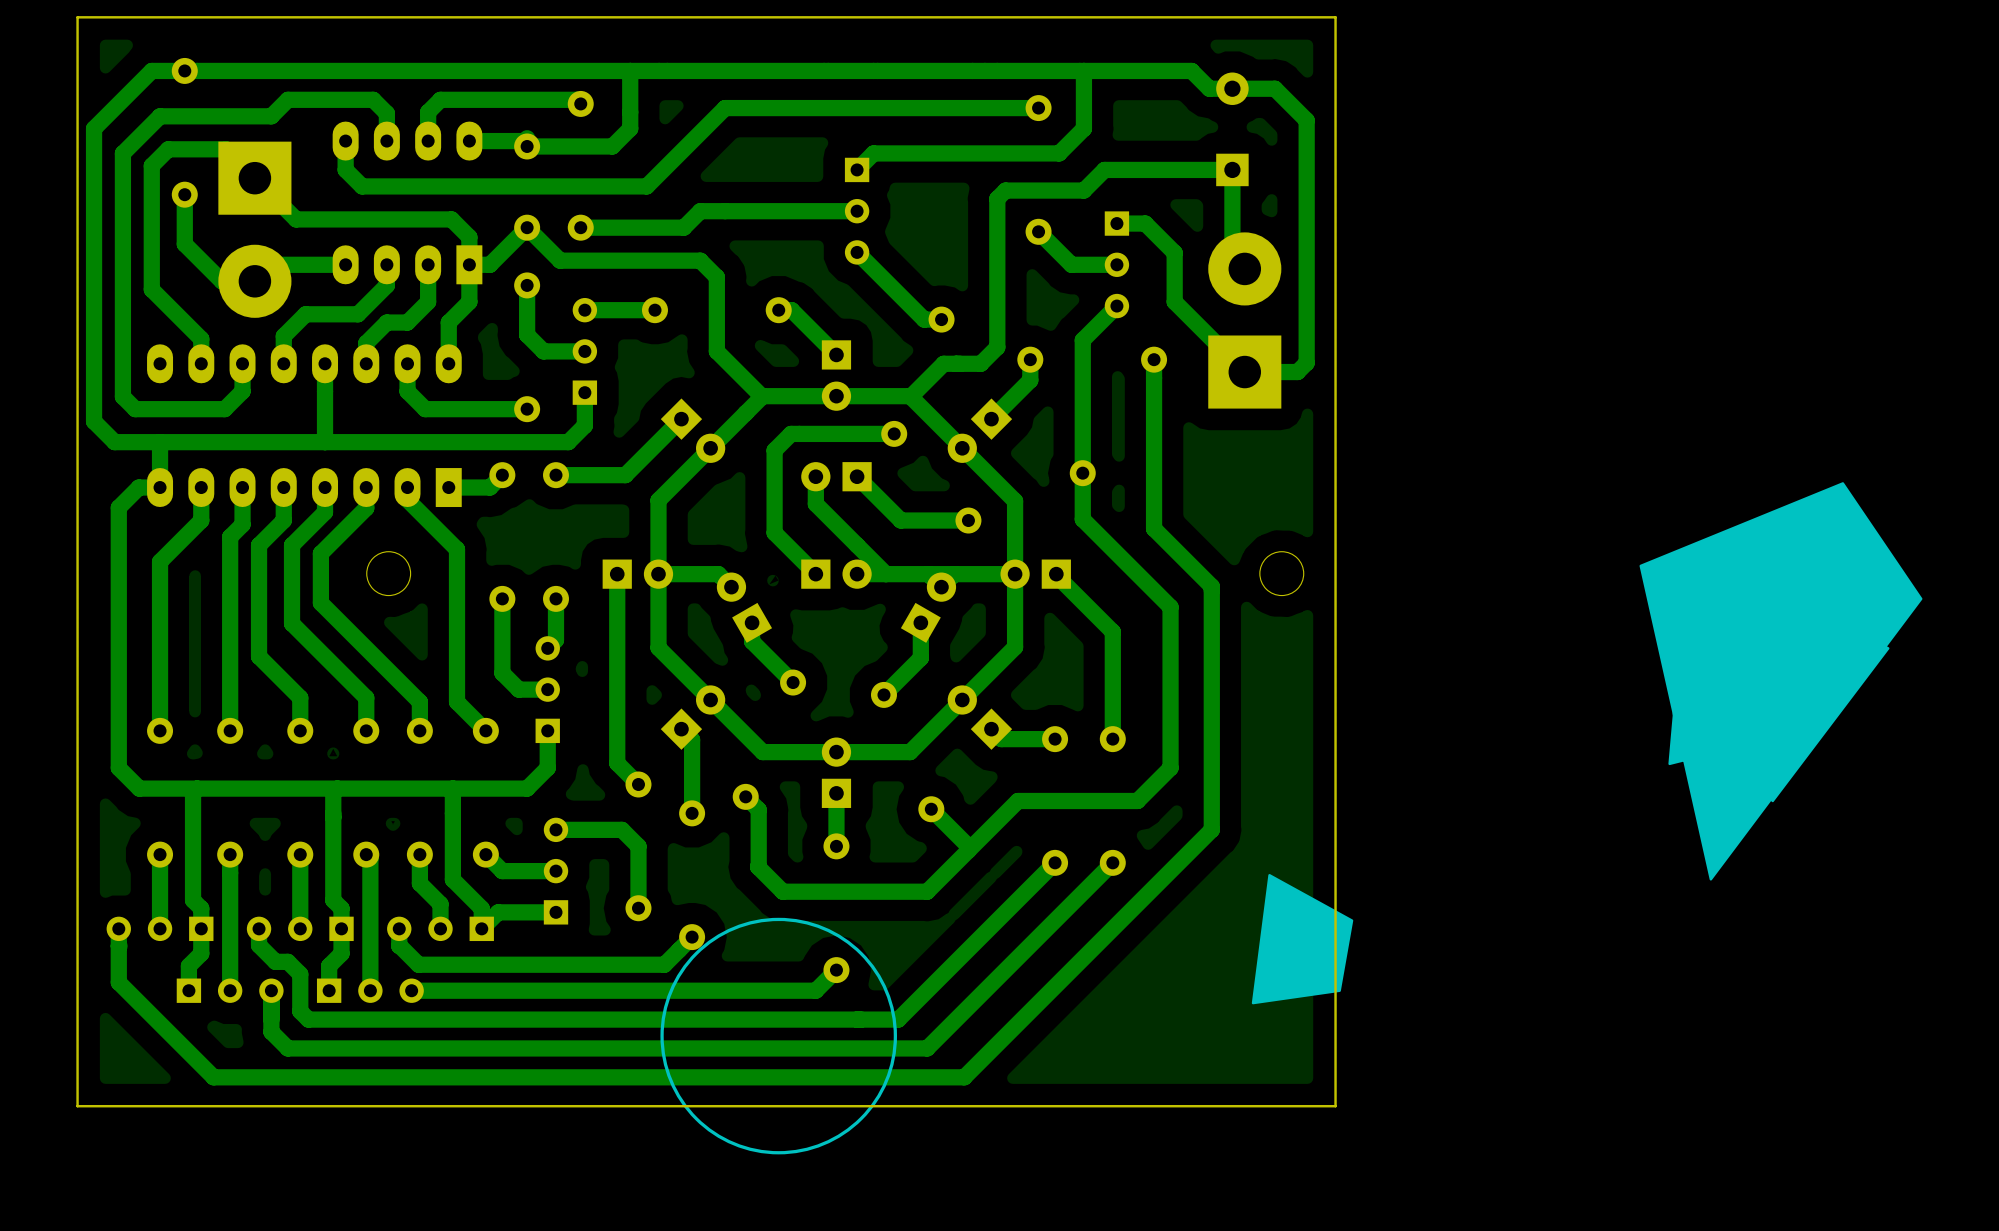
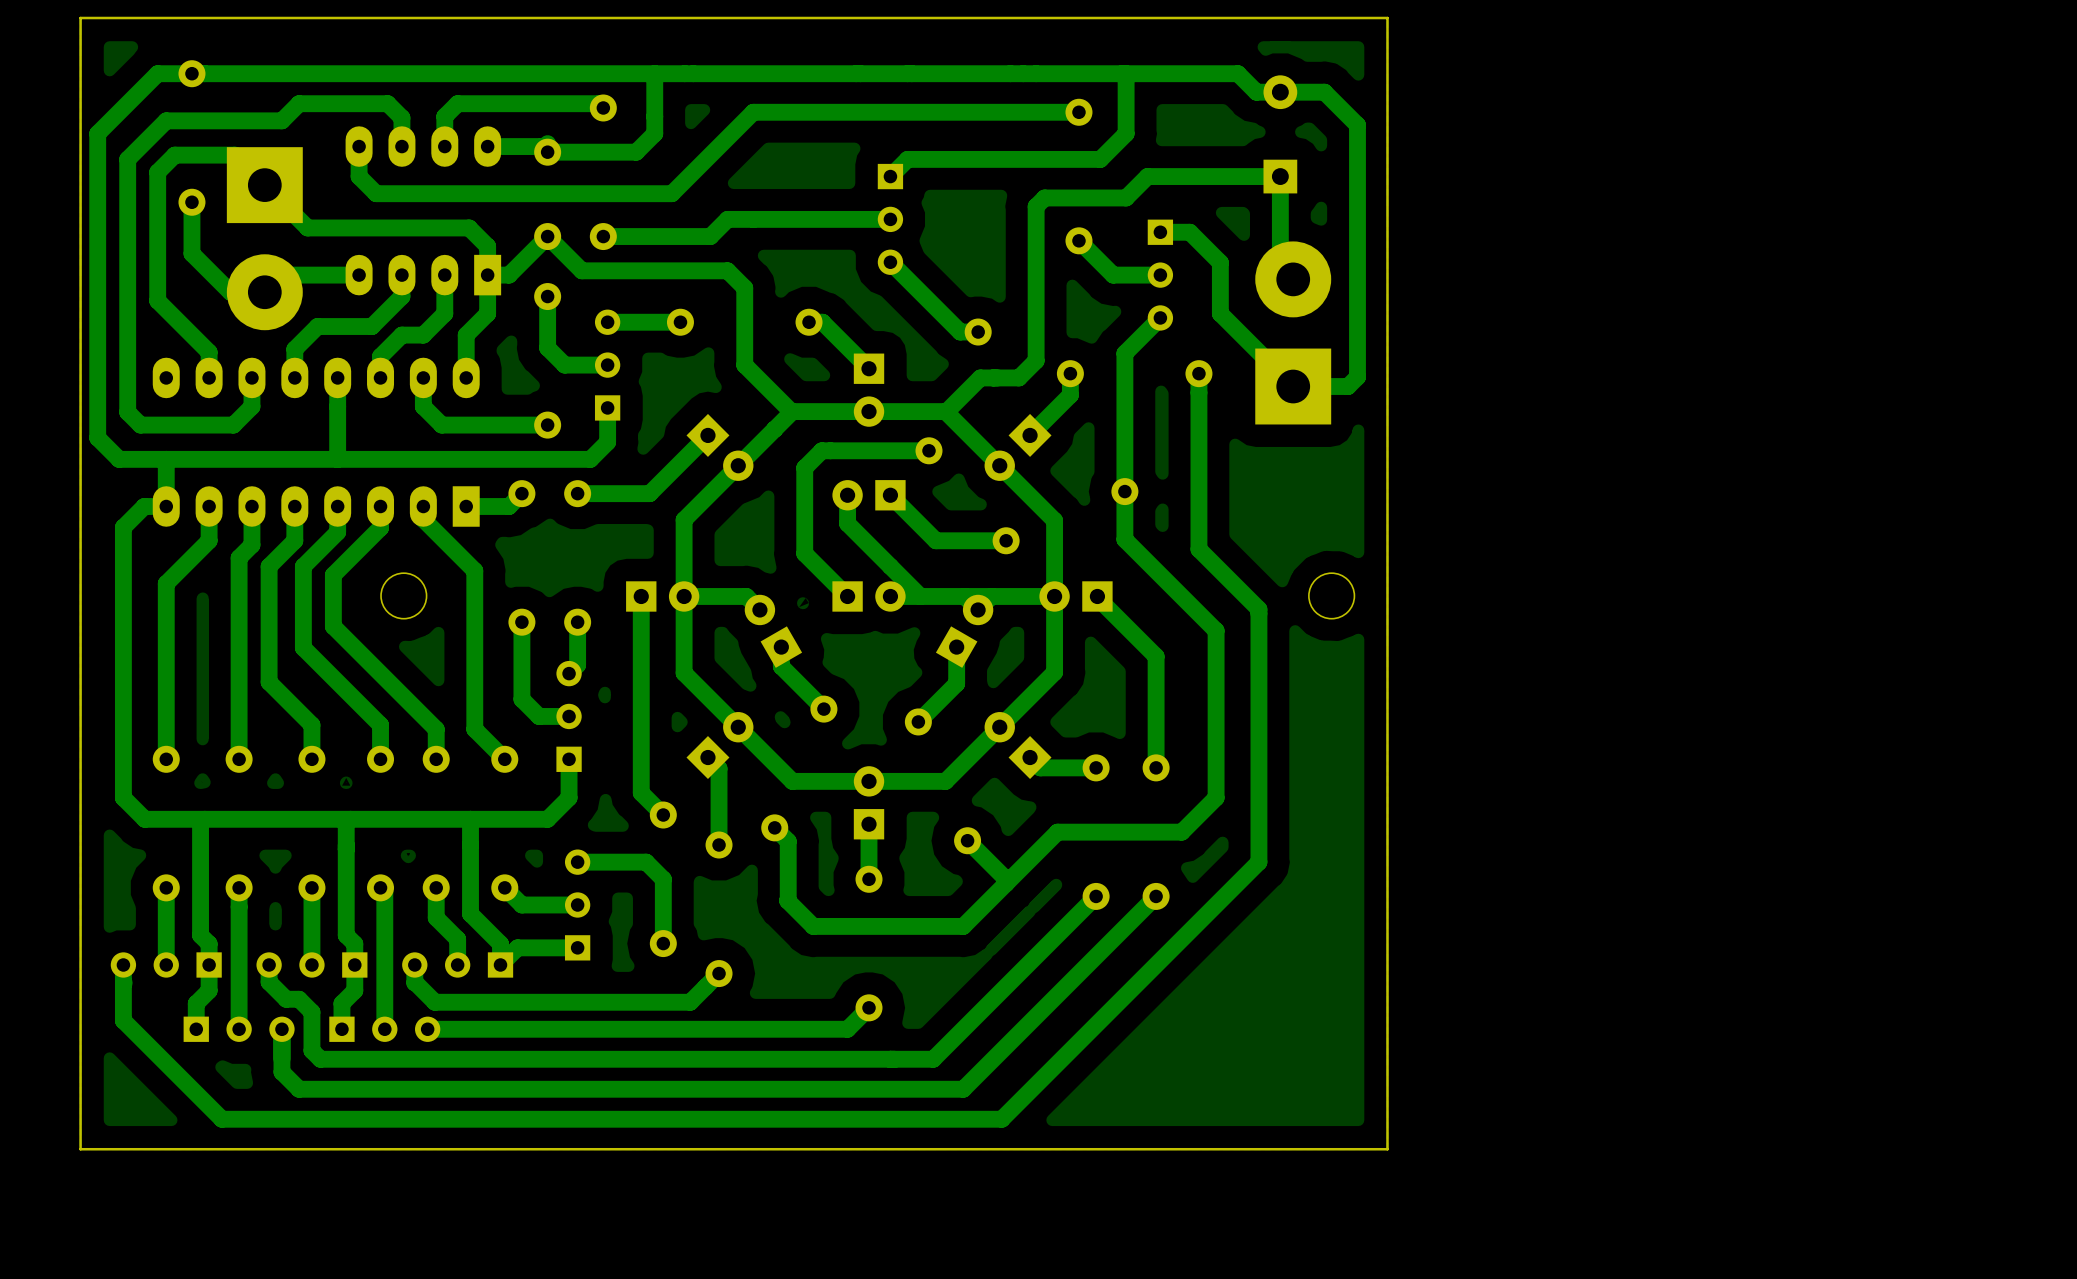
drawing: [1639, 482, 1923, 881] -> none
drawing: [1251, 874, 1354, 1005] -> none
drawing: [660, 917, 898, 1155] -> none

